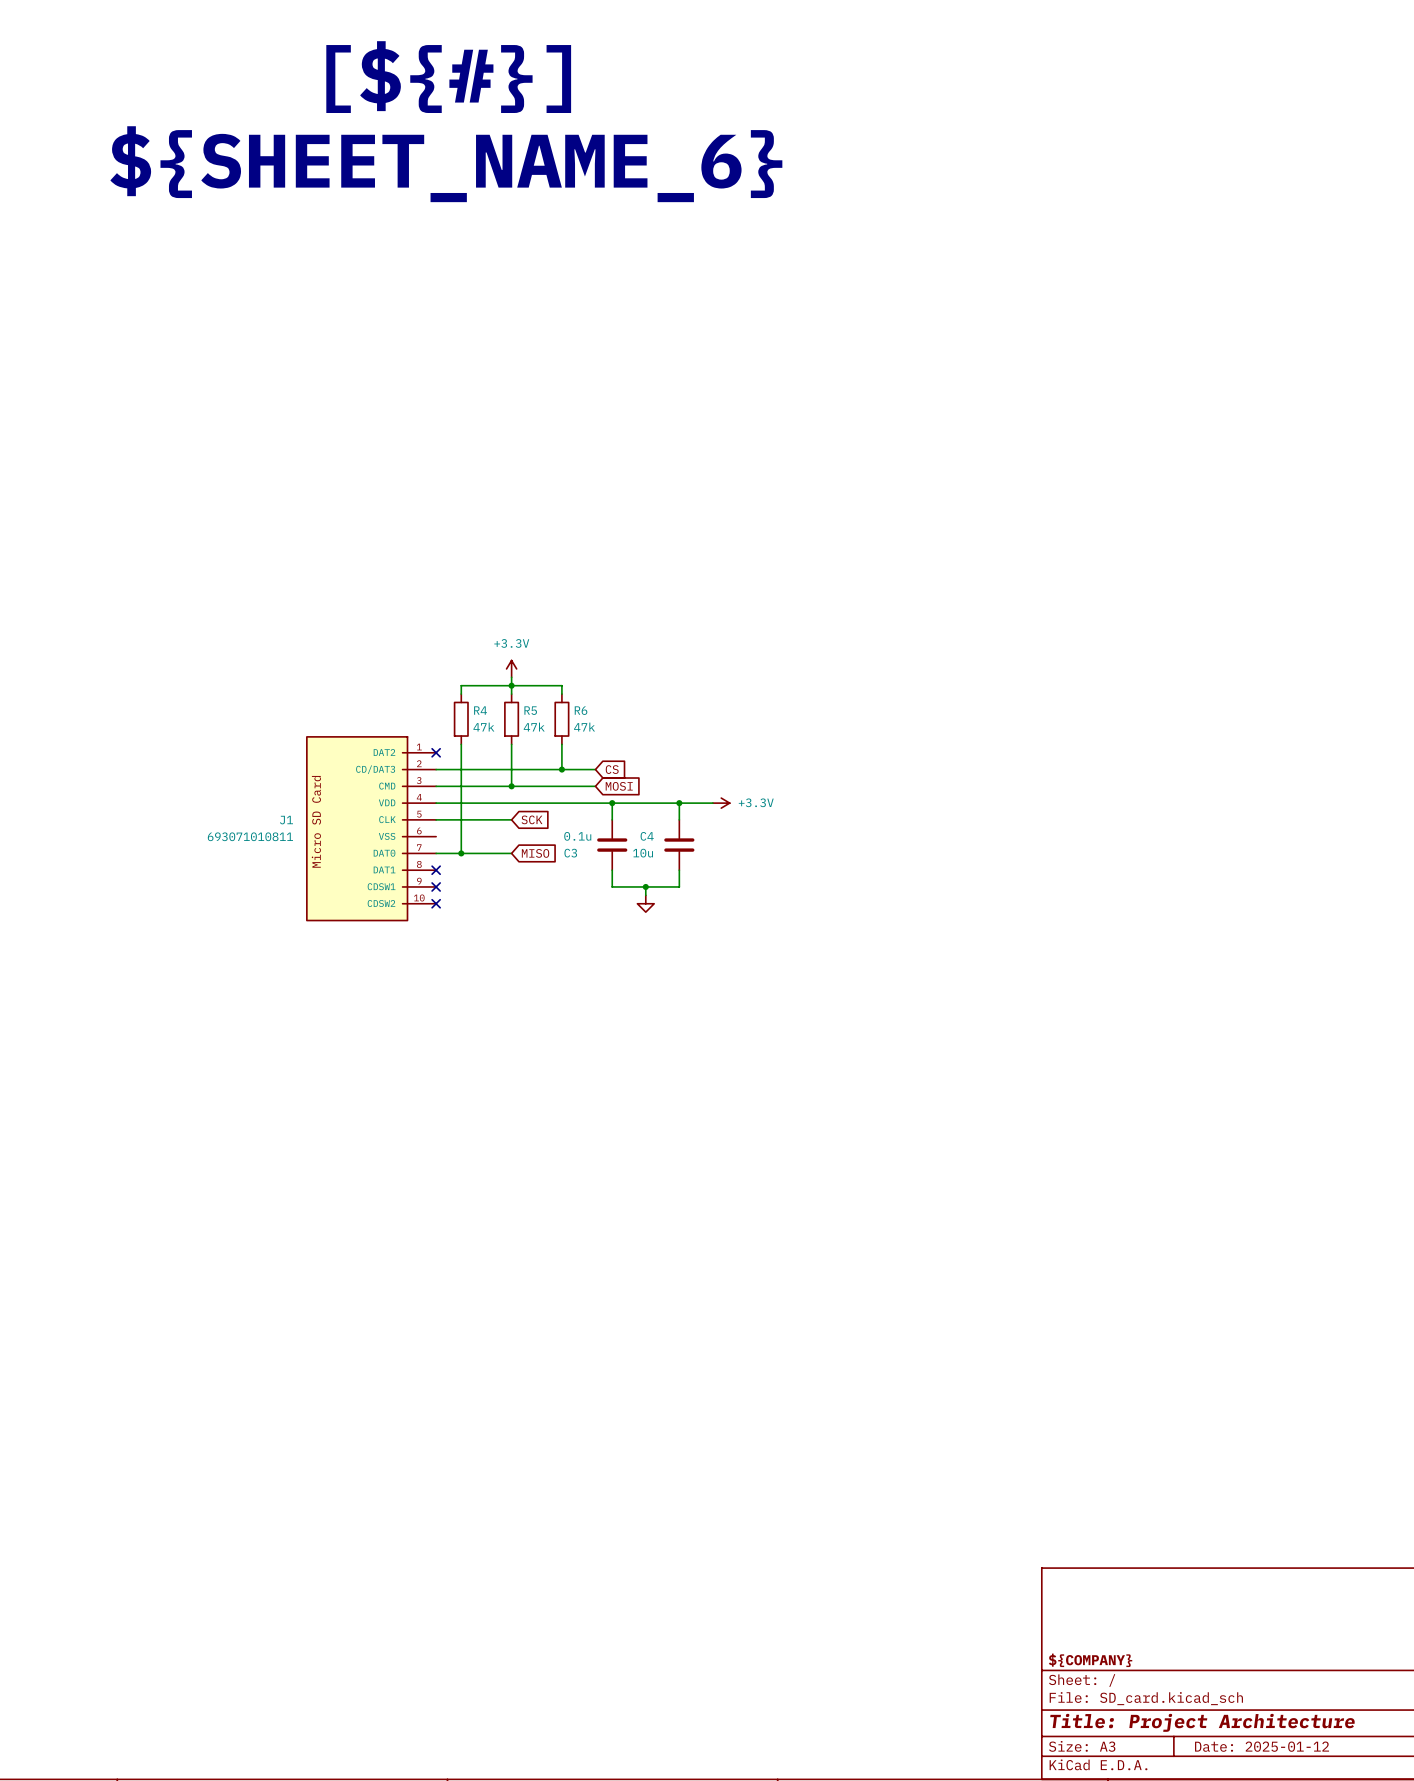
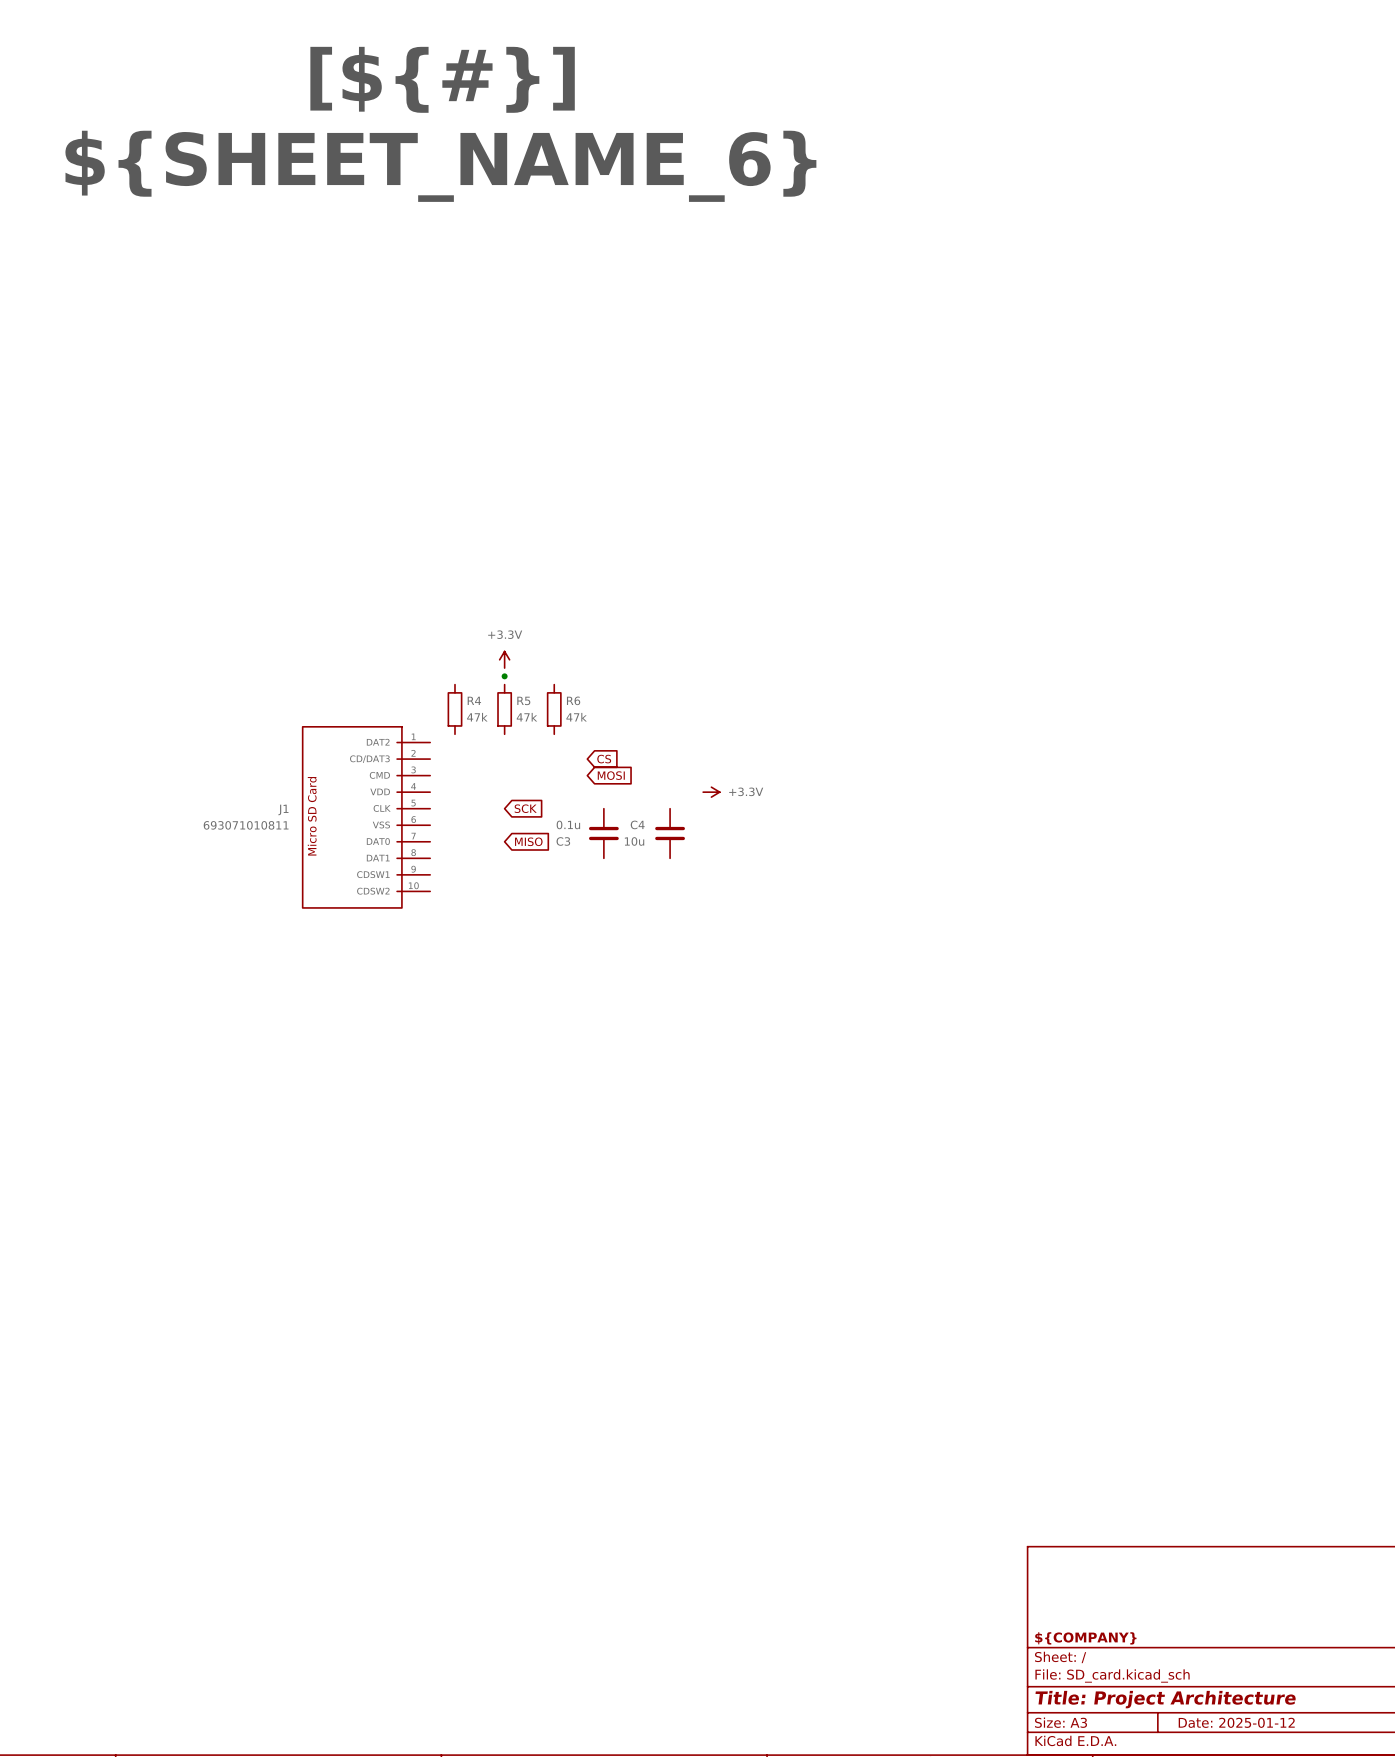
wire: (511, 677) (511, 694) -> none
wire: (461, 694) (461, 685) (561, 685) (561, 694) -> none
wire: (461, 744) (461, 853) -> none
wire: (511, 744) (511, 786) -> none
wire: (561, 744) (561, 769) -> none
no-connect mark: (436, 752) -> none
wire: (436, 769) (595, 769) -> none
junction: (561, 769) -> none
wire: (436, 786) (595, 786) -> none
junction: (511, 786) -> none
wire: (436, 803) (712, 803) -> none
wire: (612, 803) (612, 819) -> none
junction: (612, 803) -> none
wire: (679, 803) (679, 819) -> none
junction: (679, 803) -> none
wire: (436, 819) (511, 819) -> none
wire: (436, 853) (511, 853) -> none
junction: (461, 853) -> none
no-connect mark: (436, 870) -> none
wire: (612, 870) (612, 886) (679, 886) (679, 870) -> none
no-connect mark: (436, 886) -> none
wire: (645, 886) (645, 895) -> none
junction: (645, 886) -> none
no-connect mark: (436, 903) -> none
power symbol: (645, 903) -> none

